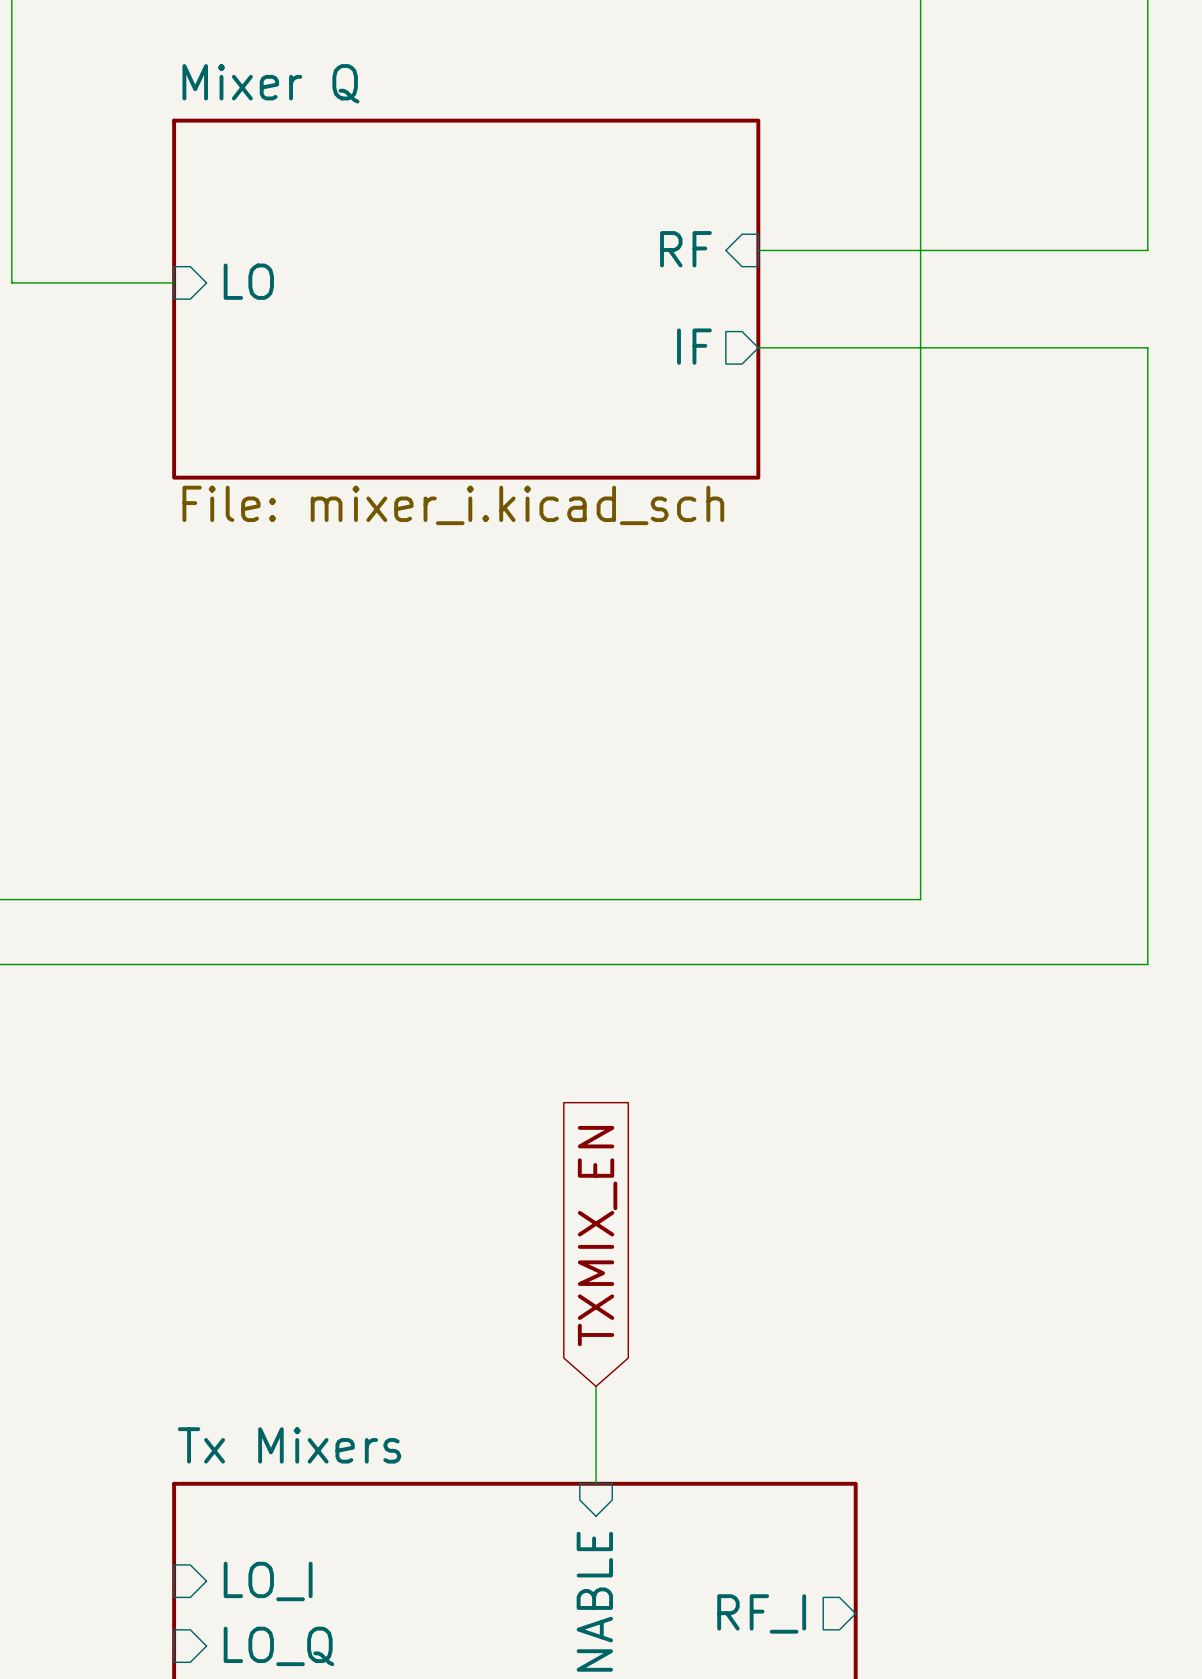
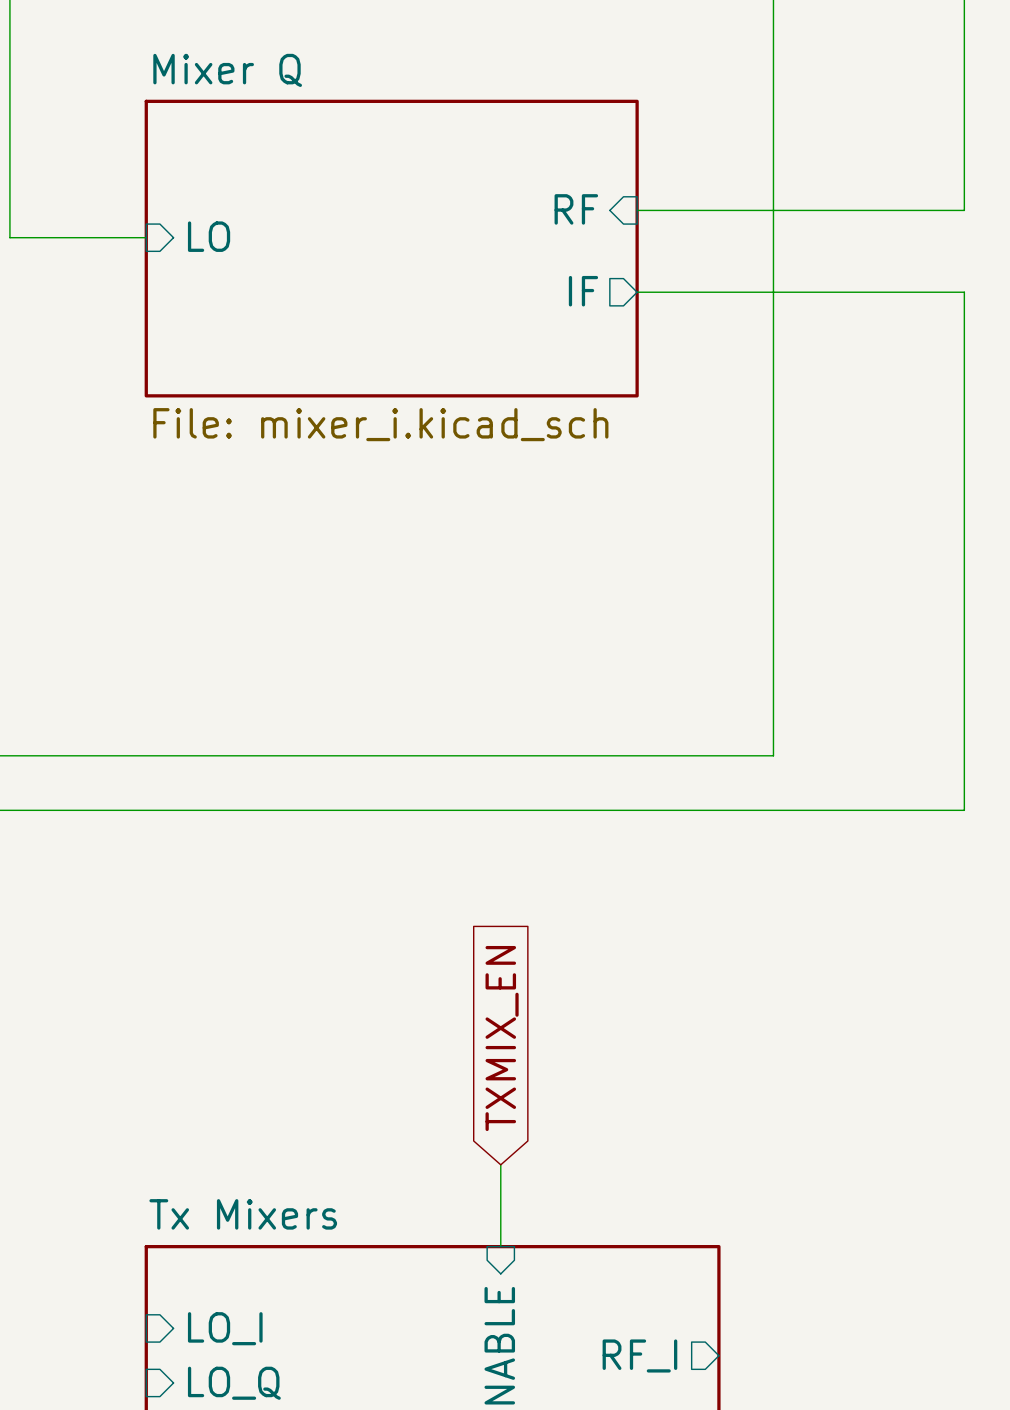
sheet Mixer Q shape: [172, 118, 761, 480] -> [144, 99, 639, 398]

